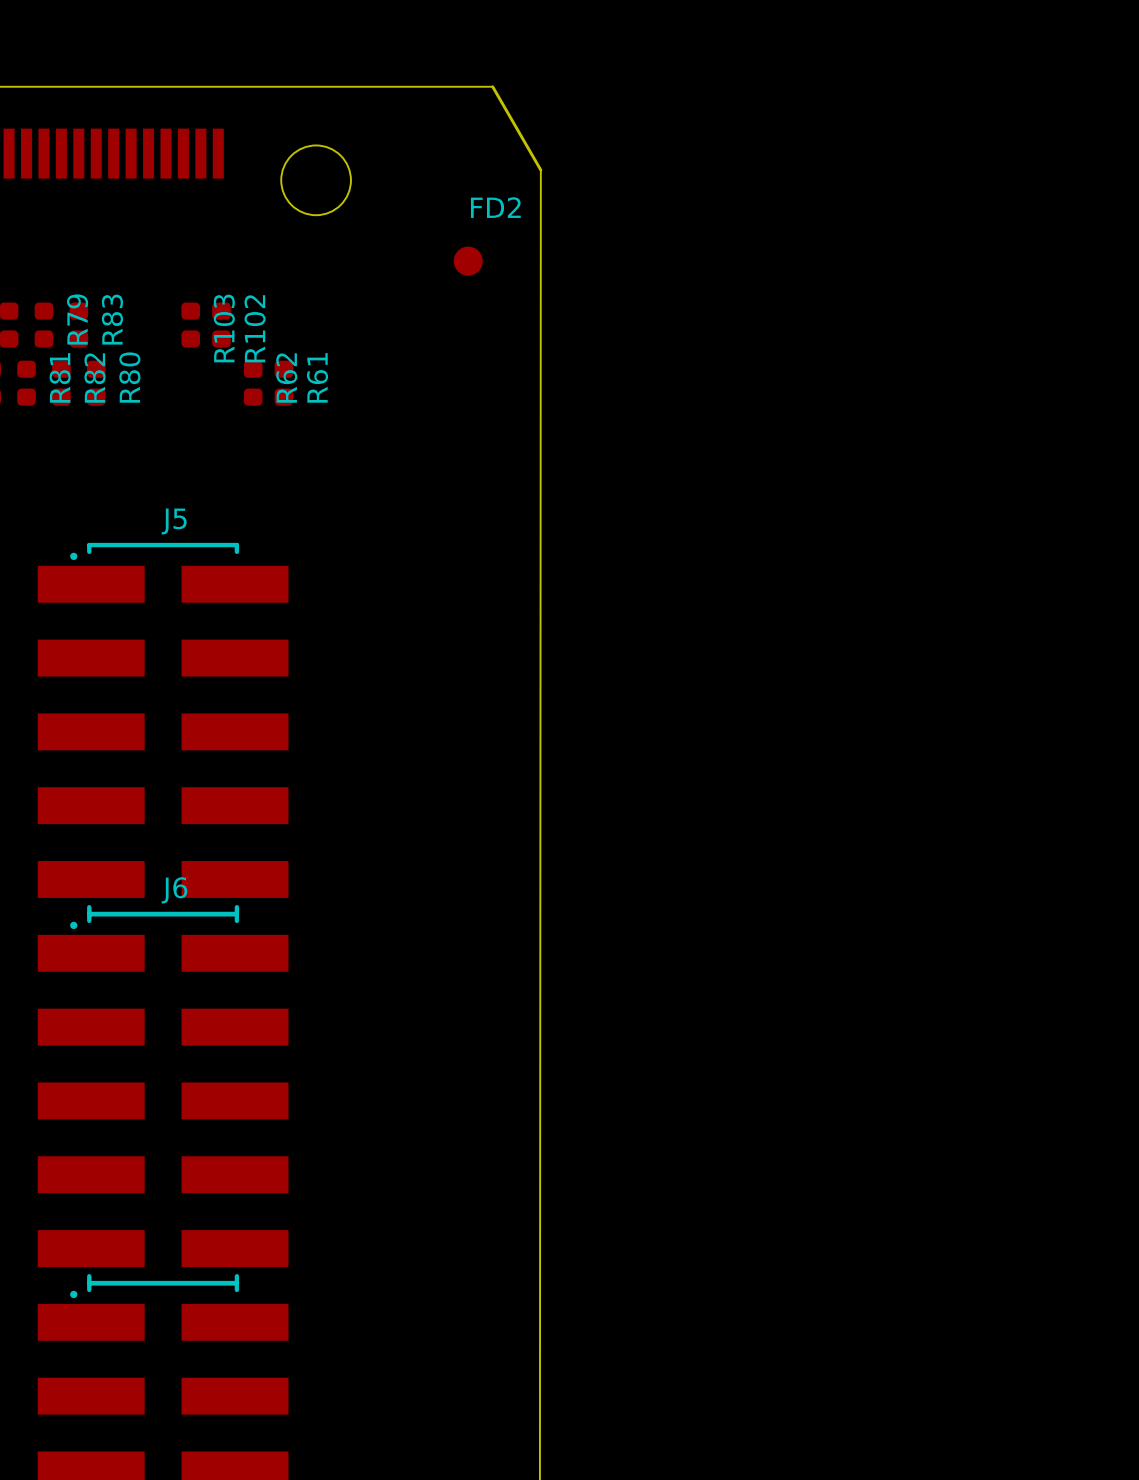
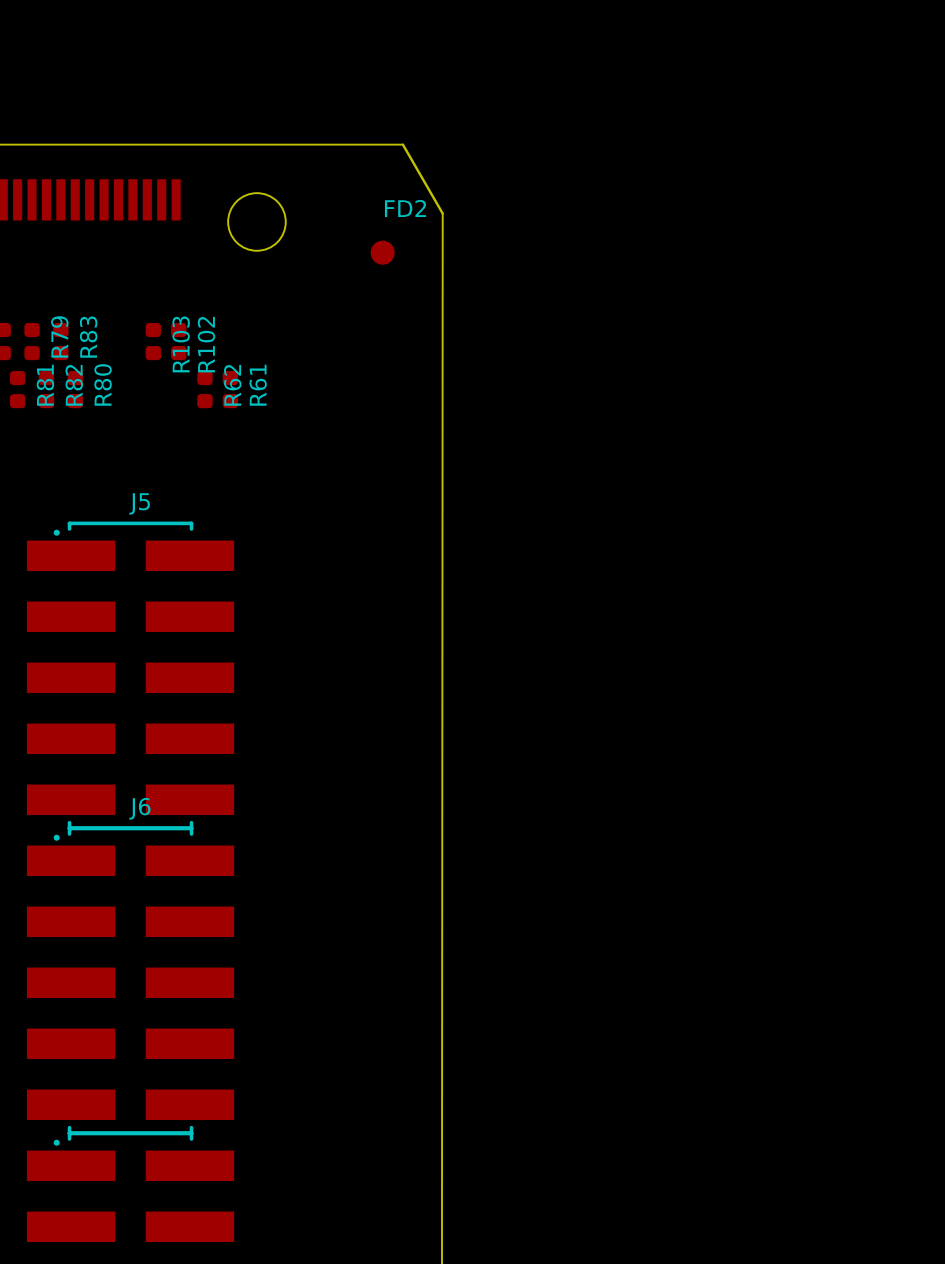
FD2 position: (468, 261) -> (382, 252)

